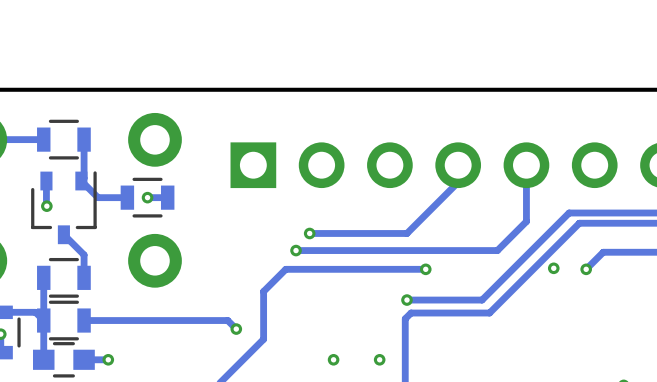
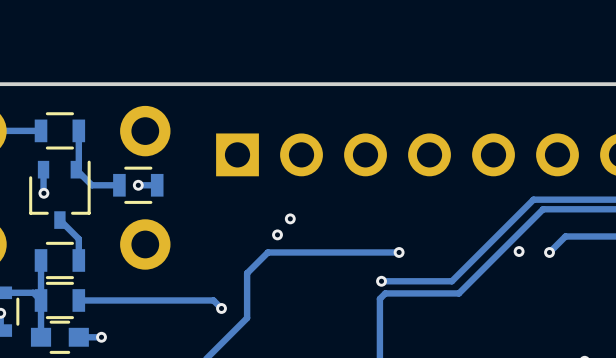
track: (458, 165) (458, 182) (406, 233) (309, 233) -> none
track: (526, 165) (526, 221) (497, 250) (296, 250) -> none
via: (333, 359) -> none
via: (379, 359) -> none

